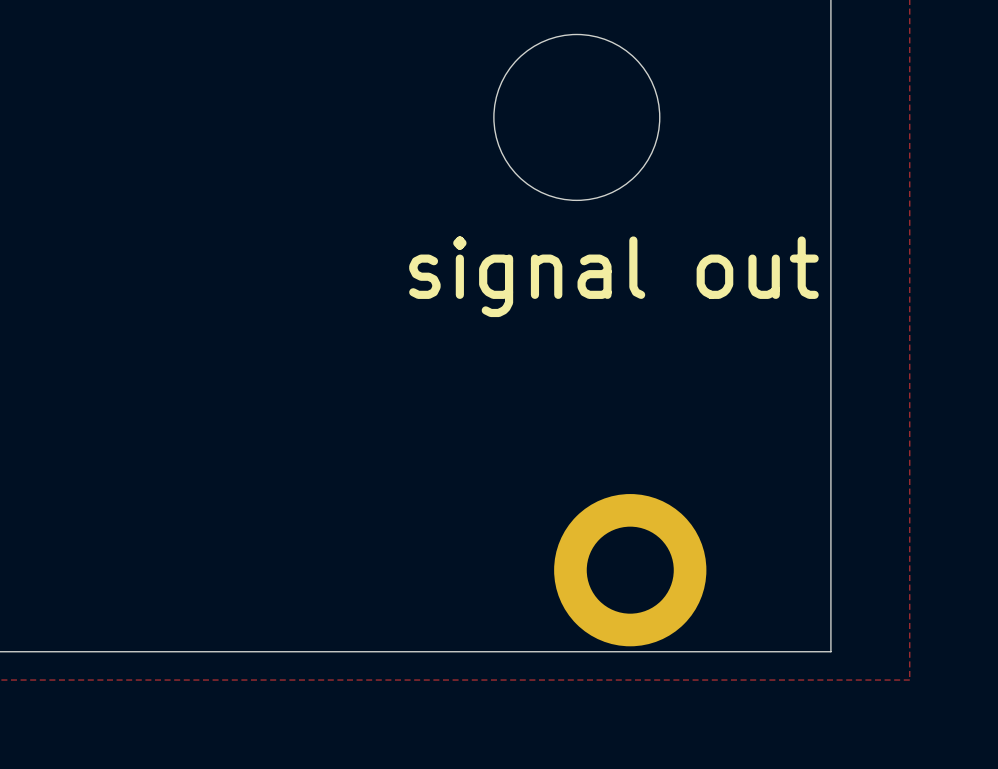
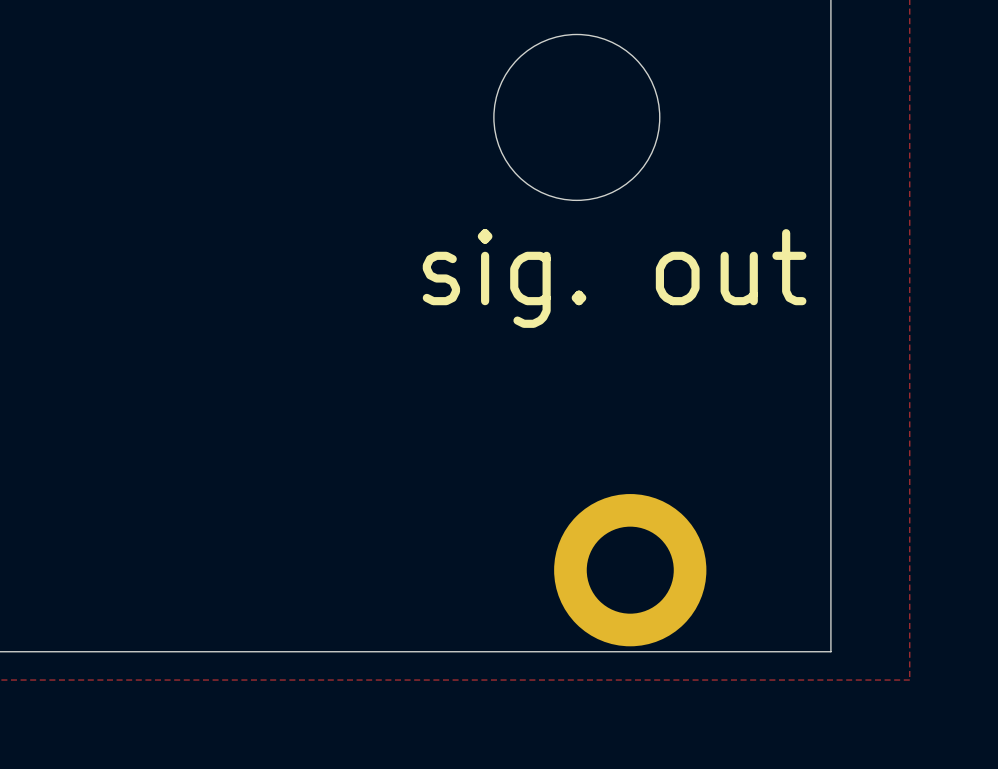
text: signal out (613, 276) -> sig. out (614, 278)

